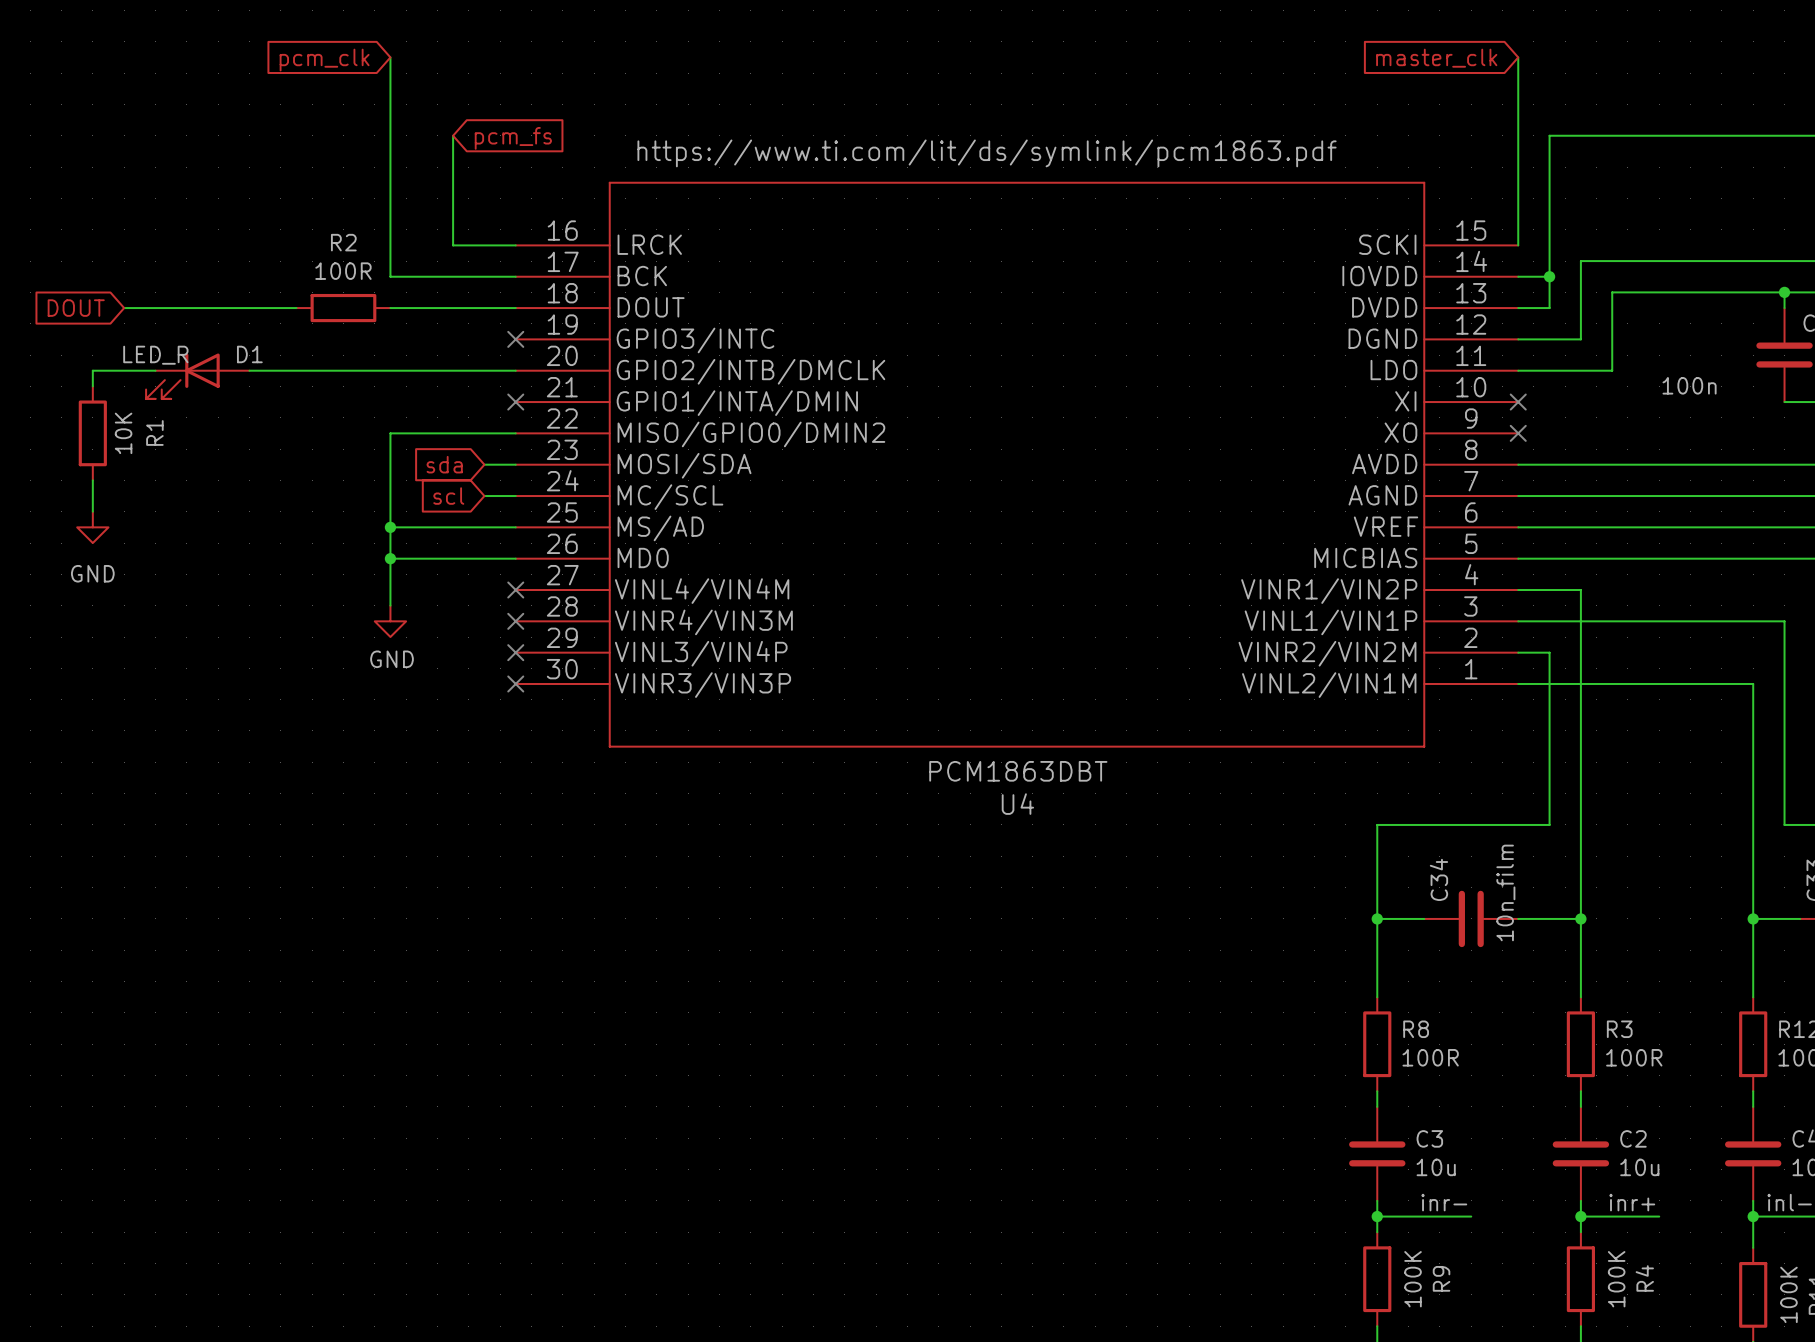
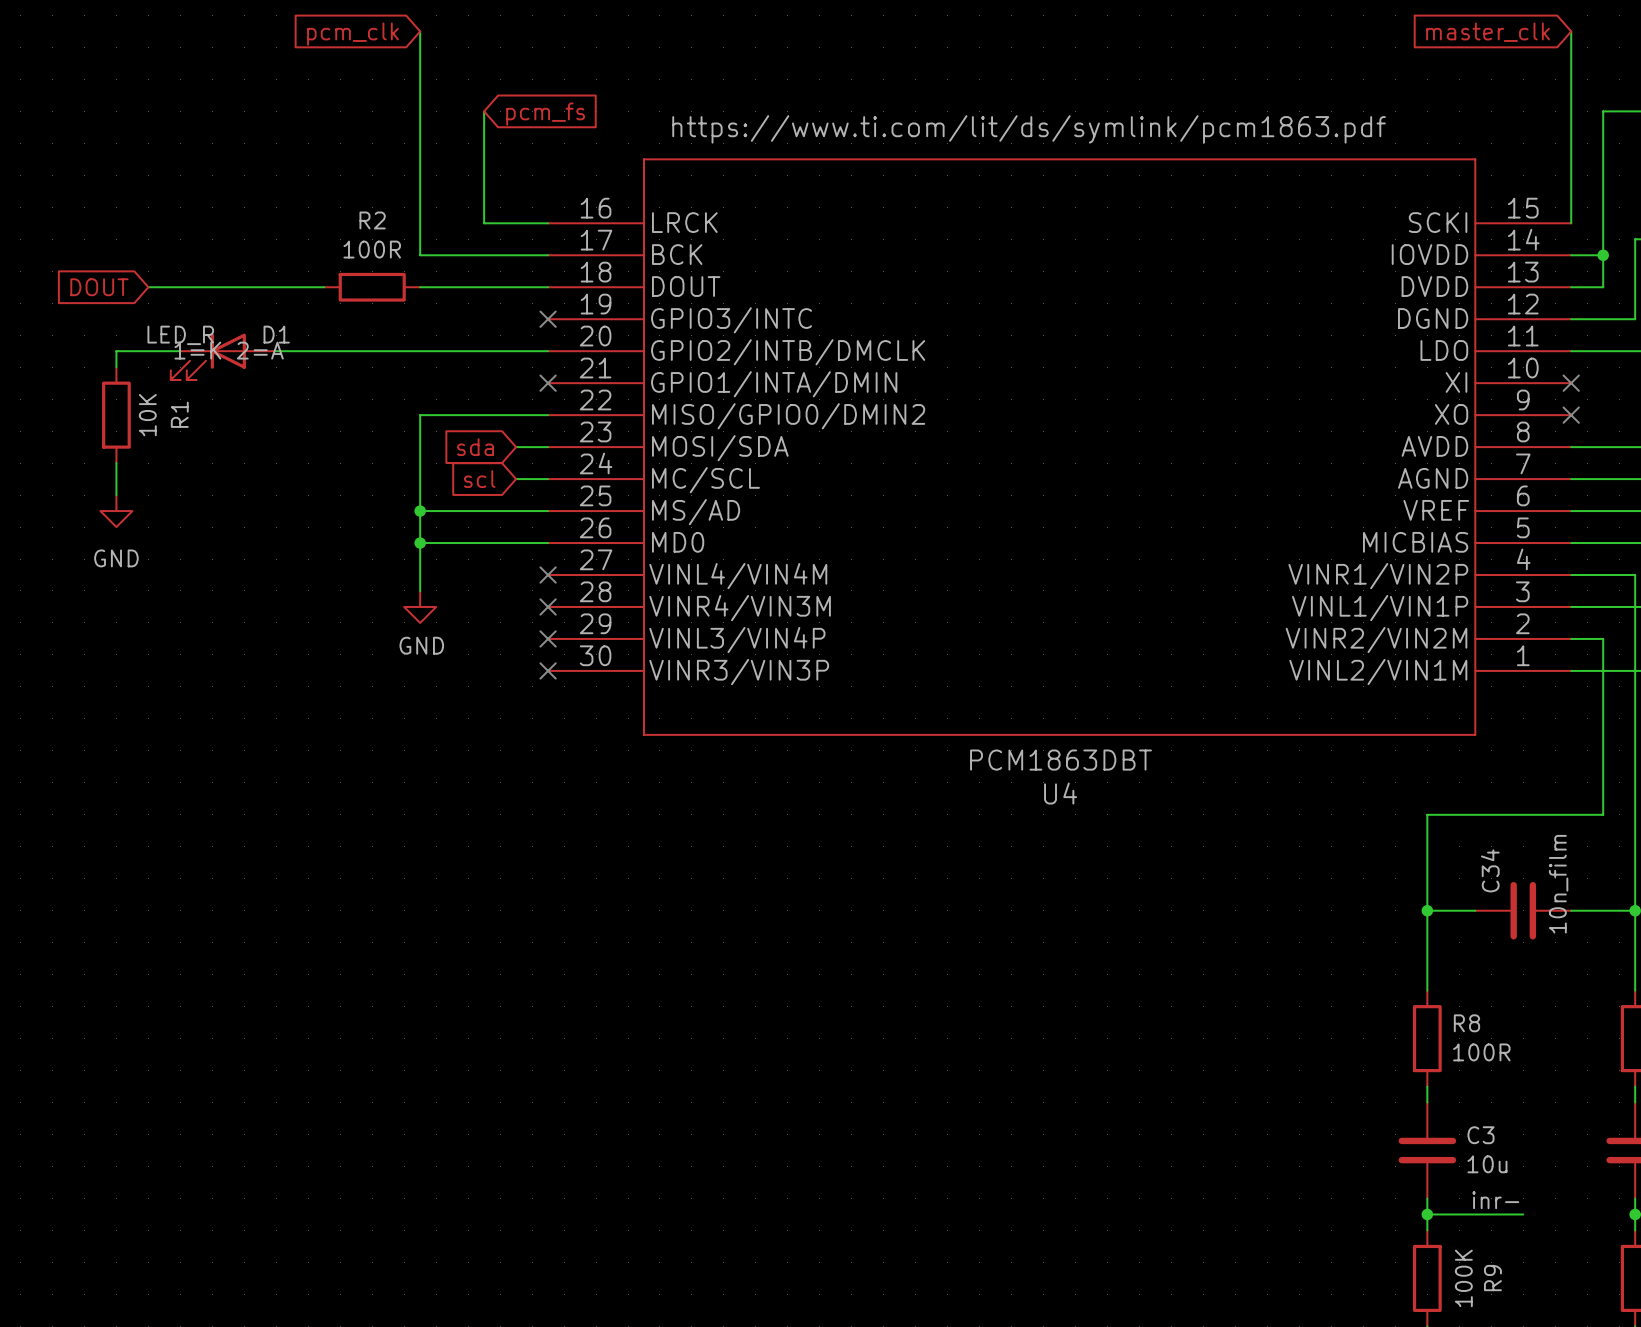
D1 text: none -> 1=K 2=A (229, 350)

